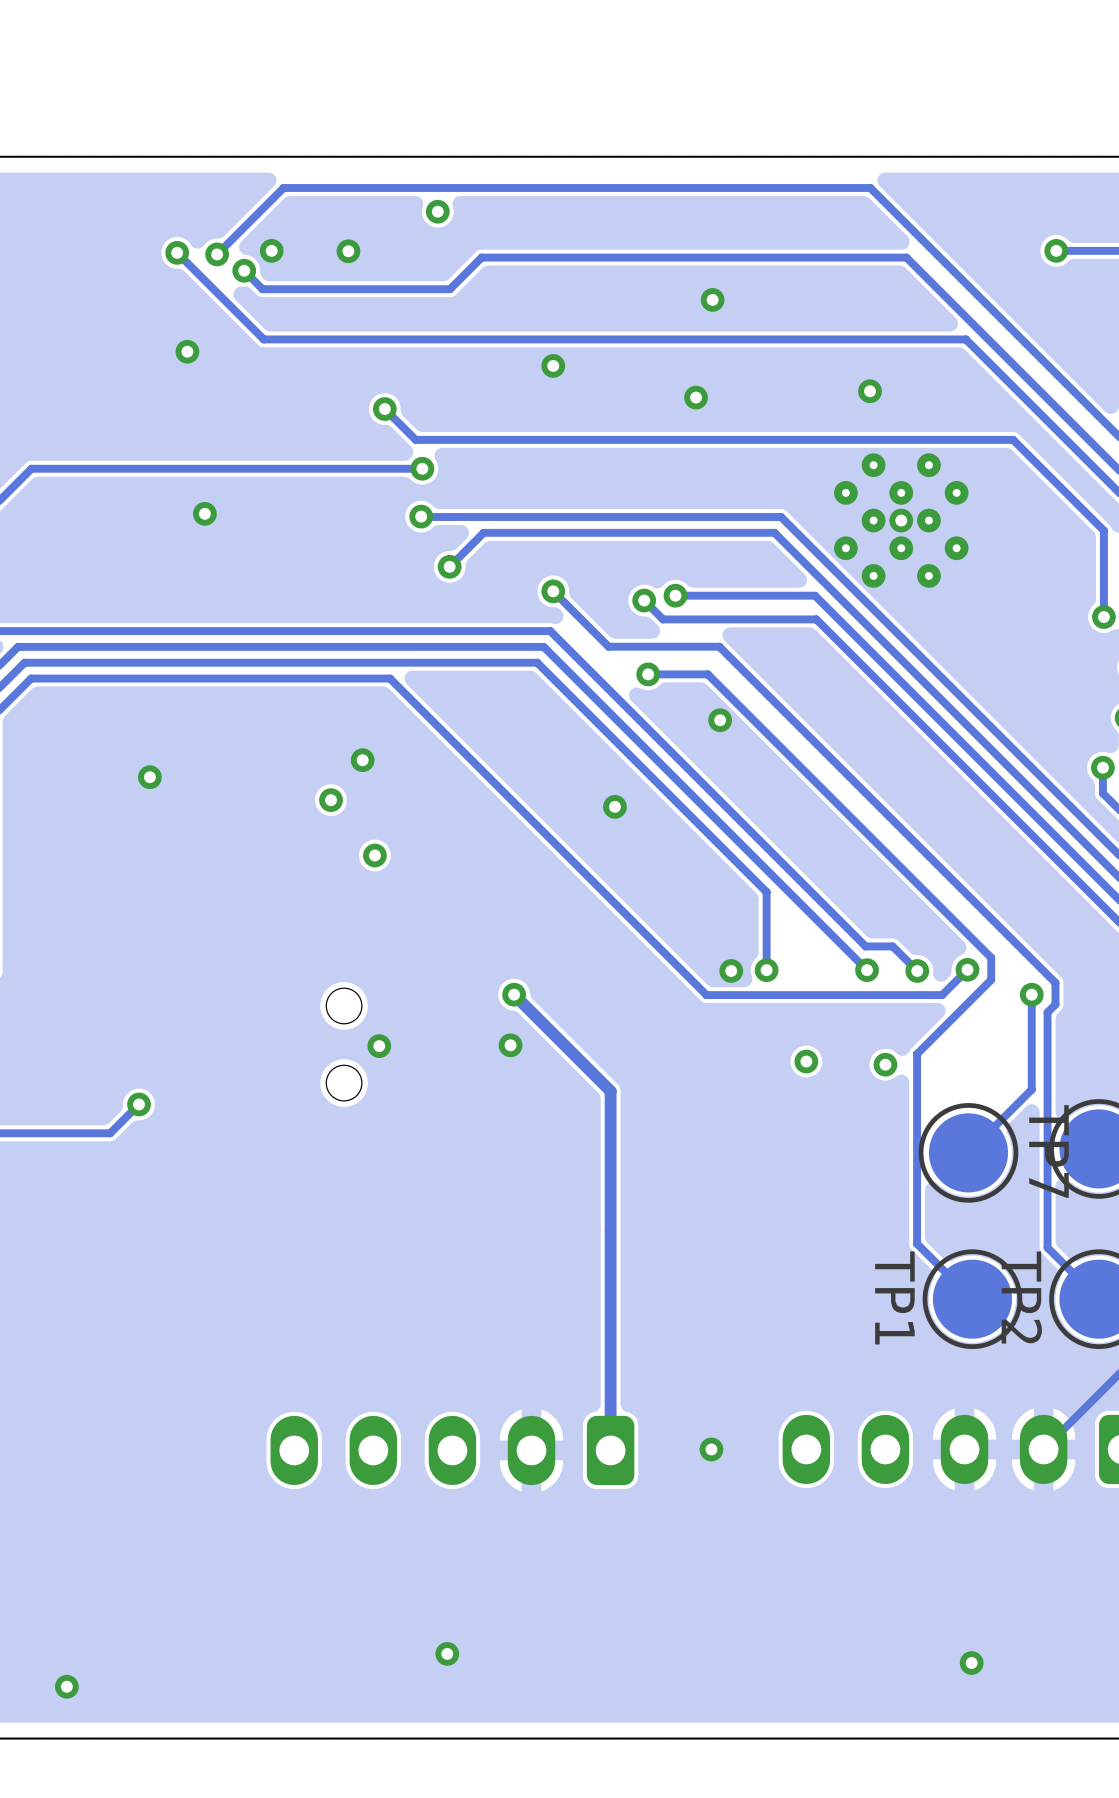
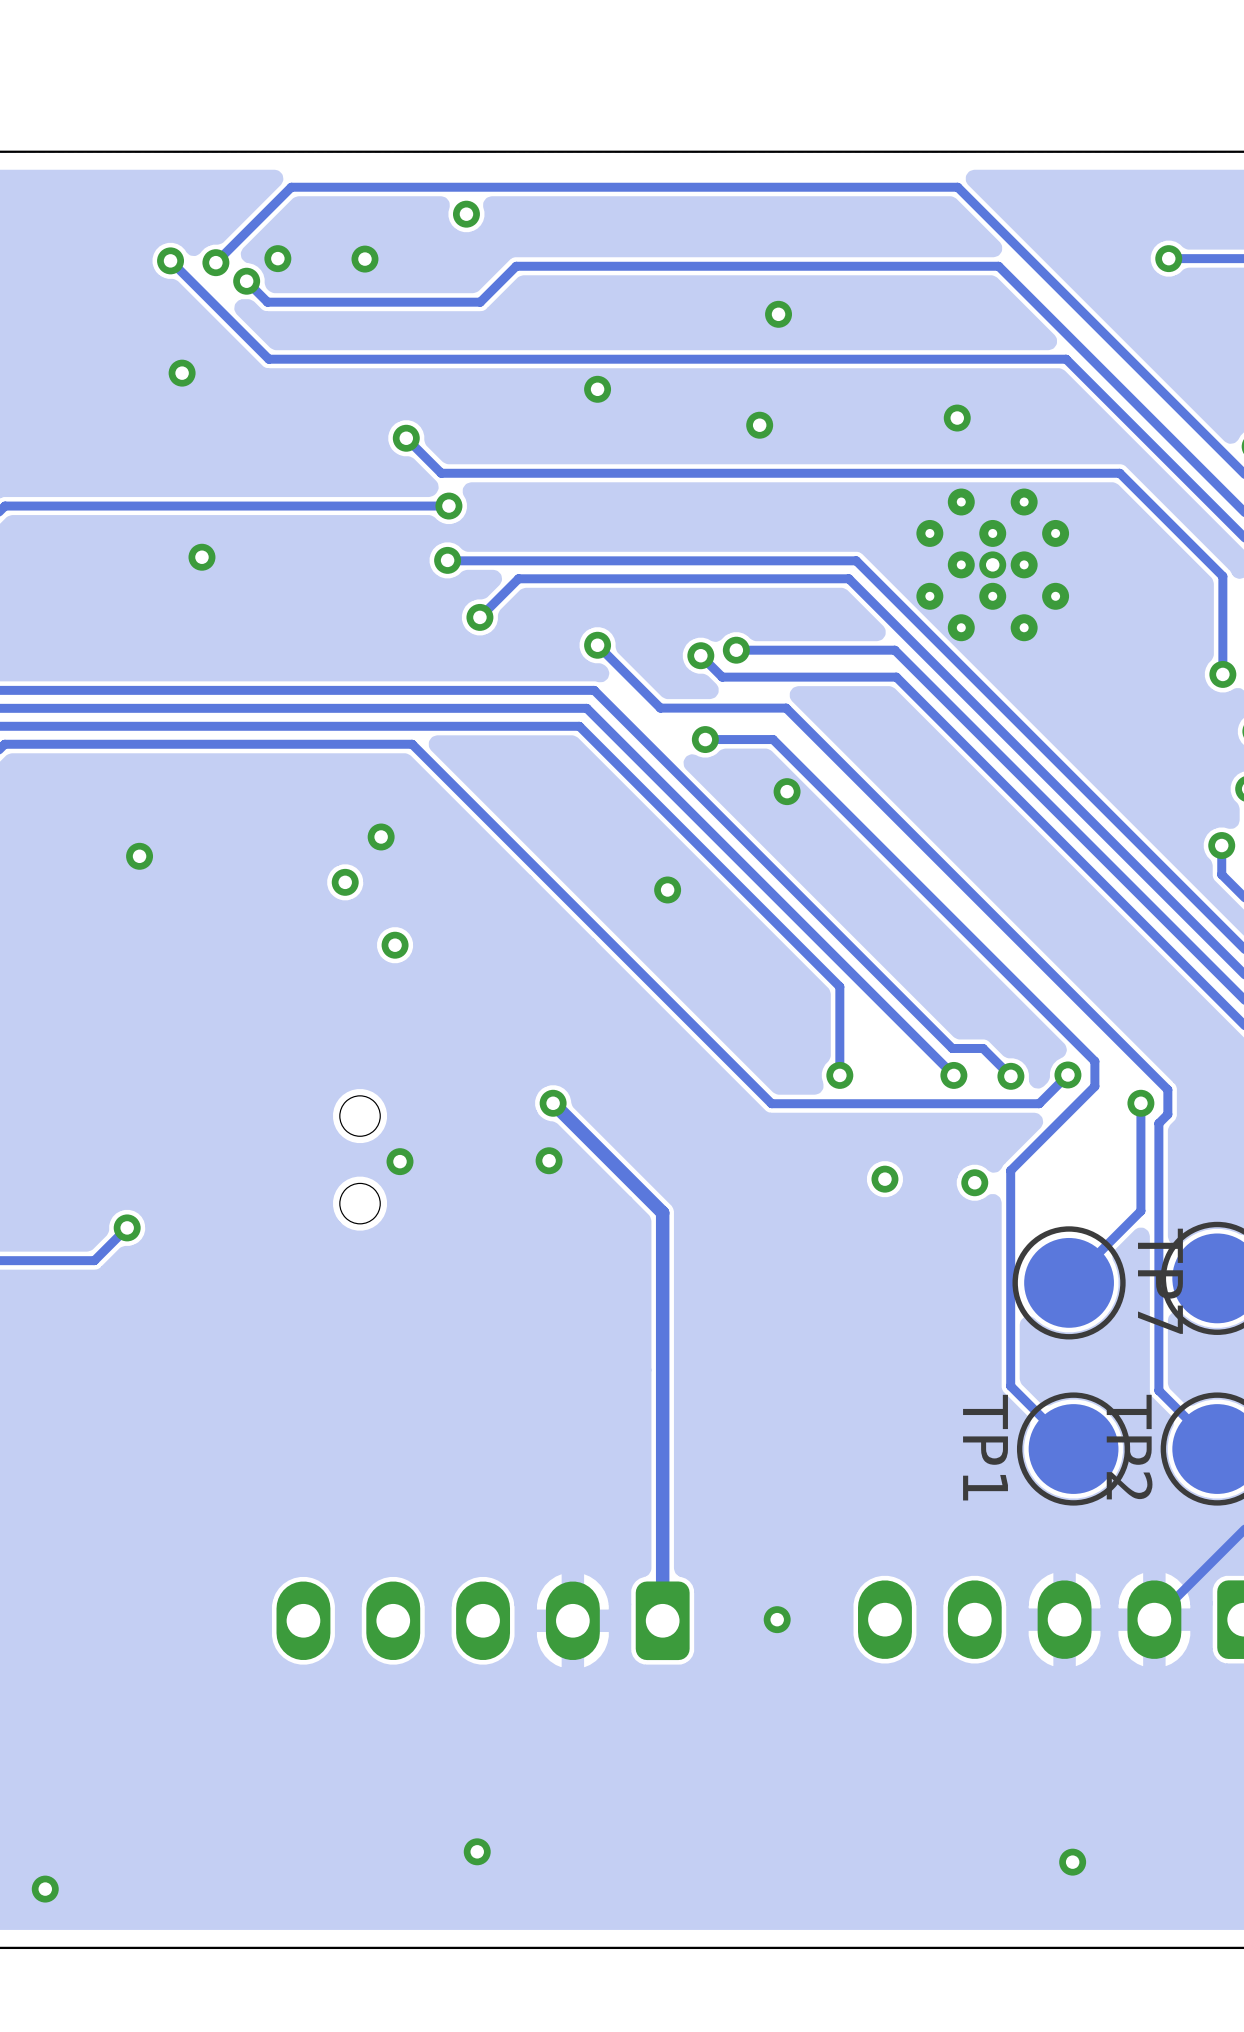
via: (731, 970) -> none

